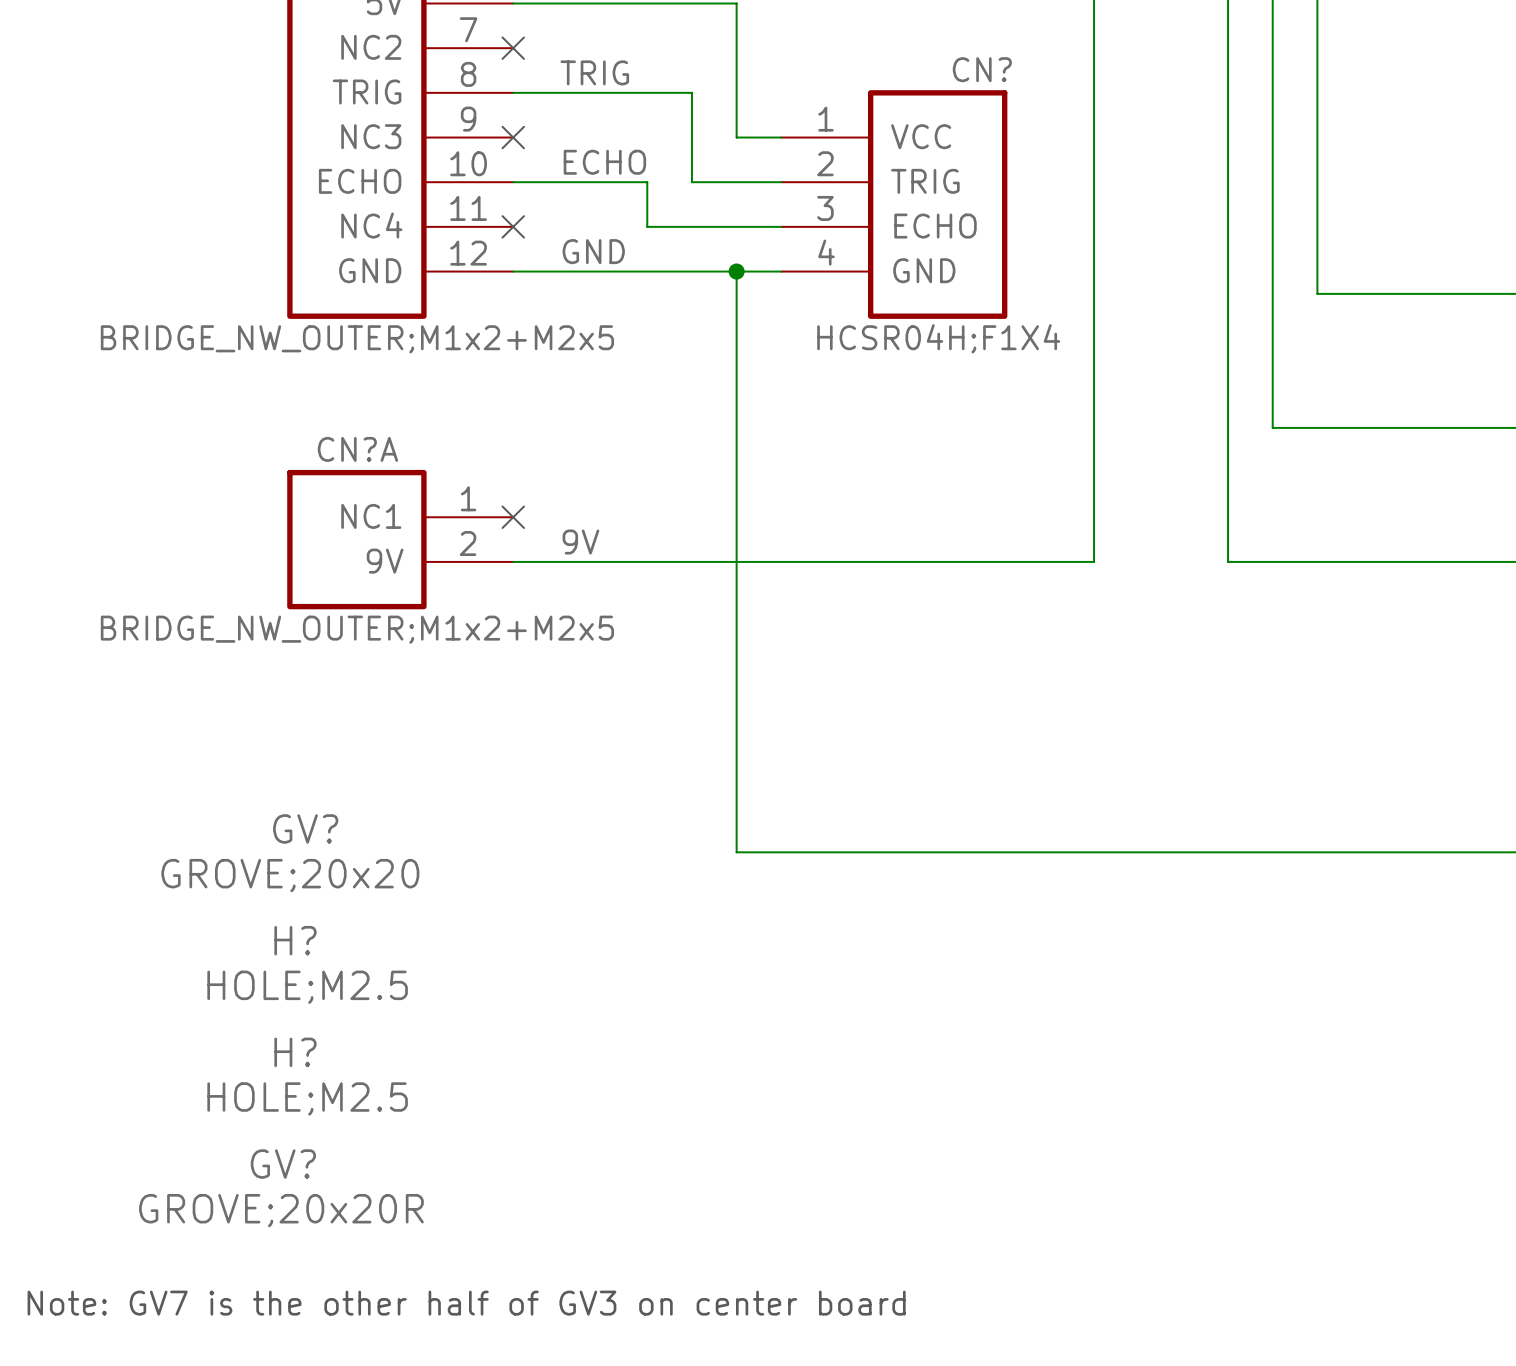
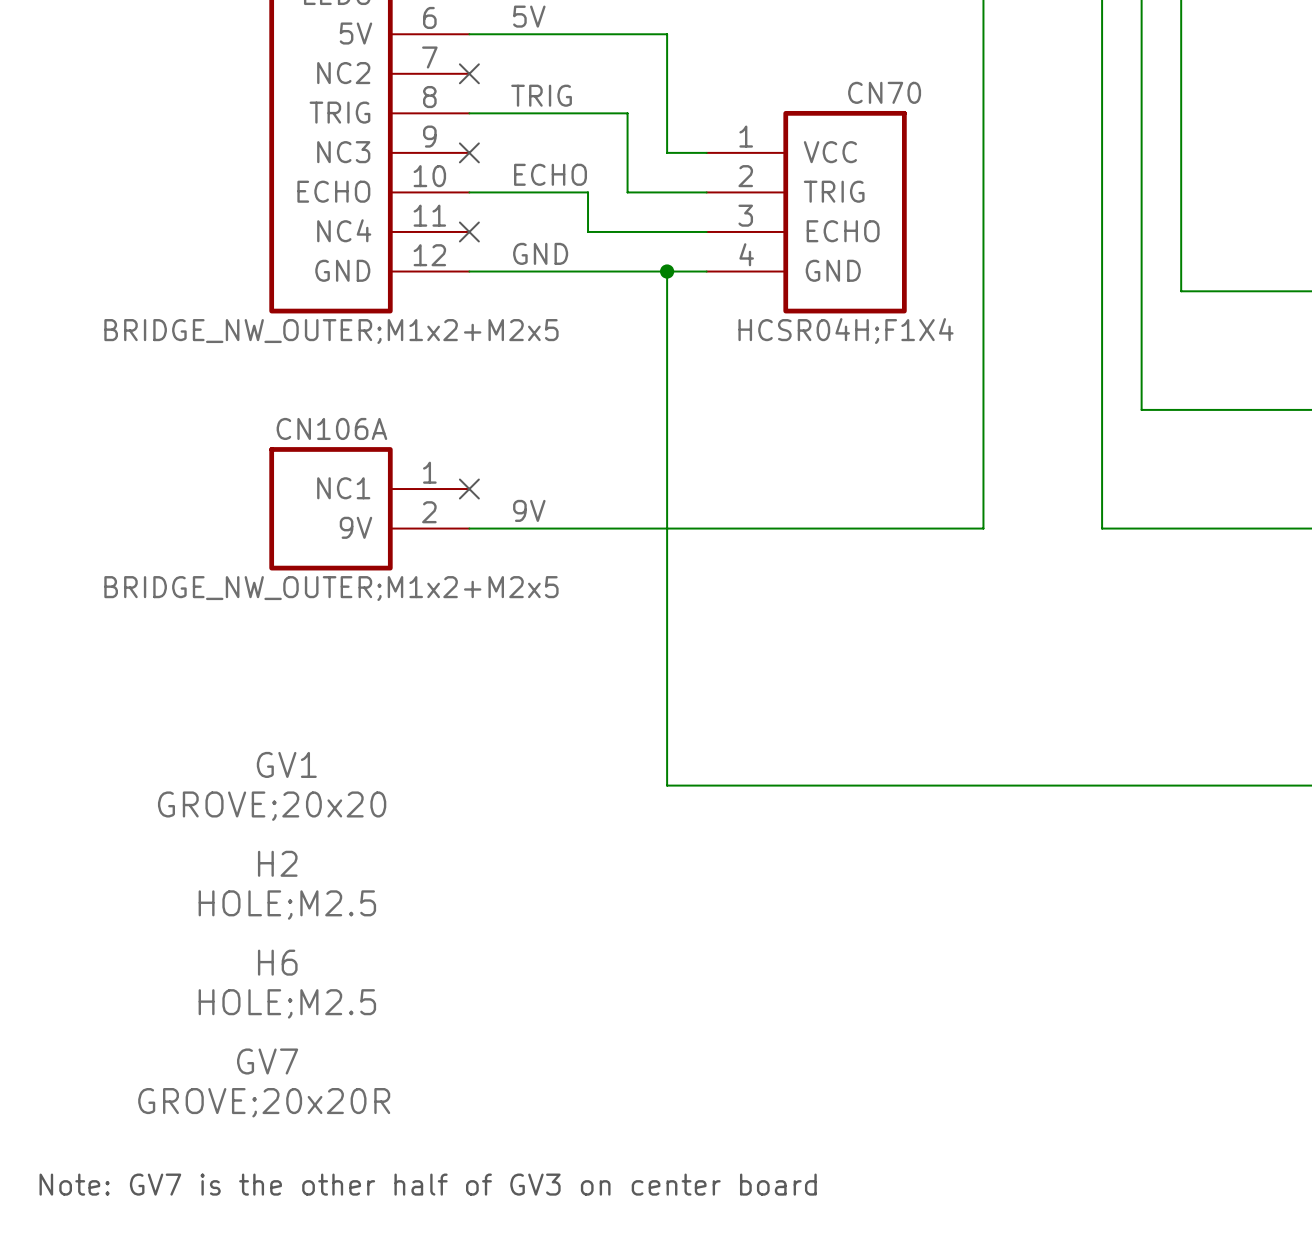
CN? name: CN? (982, 69) -> CN70 (884, 92)
CN?A name: CN?A (357, 449) -> CN106A (331, 428)
GV? name: GV? (305, 828) -> GV1 (286, 764)
H? name: H? (295, 940) -> H2 (277, 863)
H? name: H? (295, 1052) -> H6 (277, 962)
GV? name: GV? (283, 1164) -> GV7 (267, 1061)

